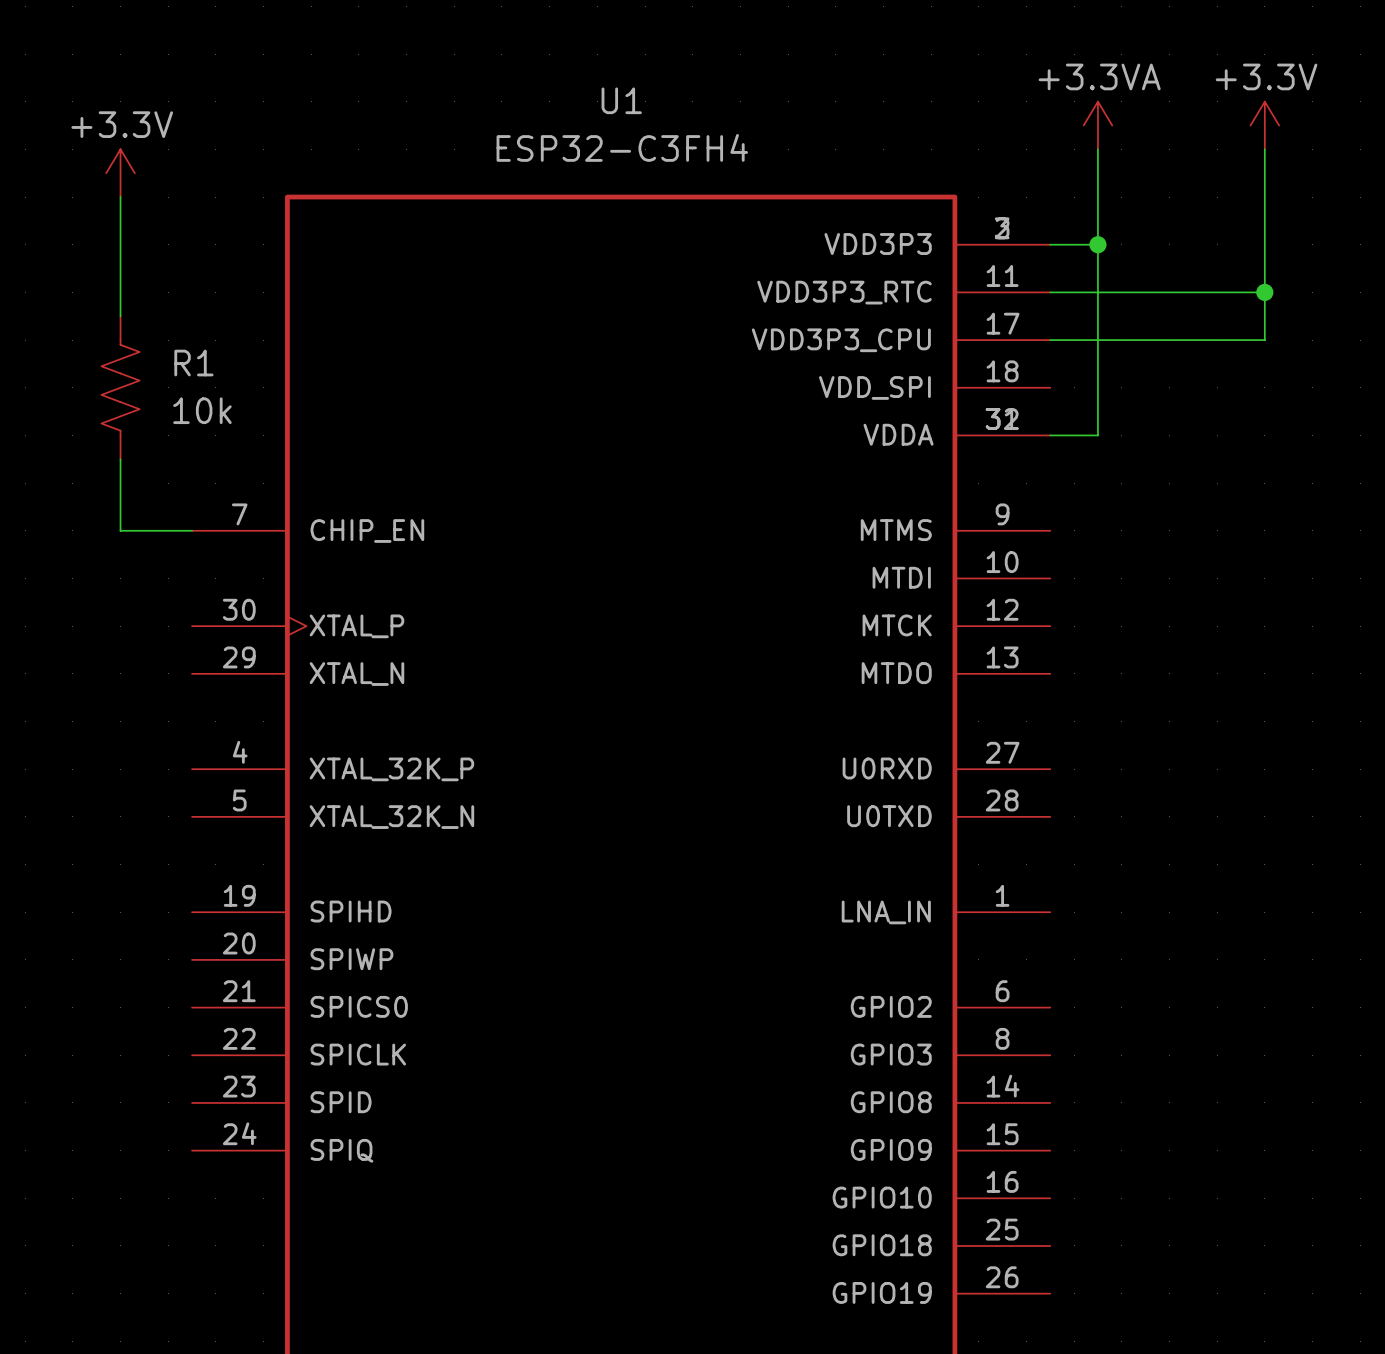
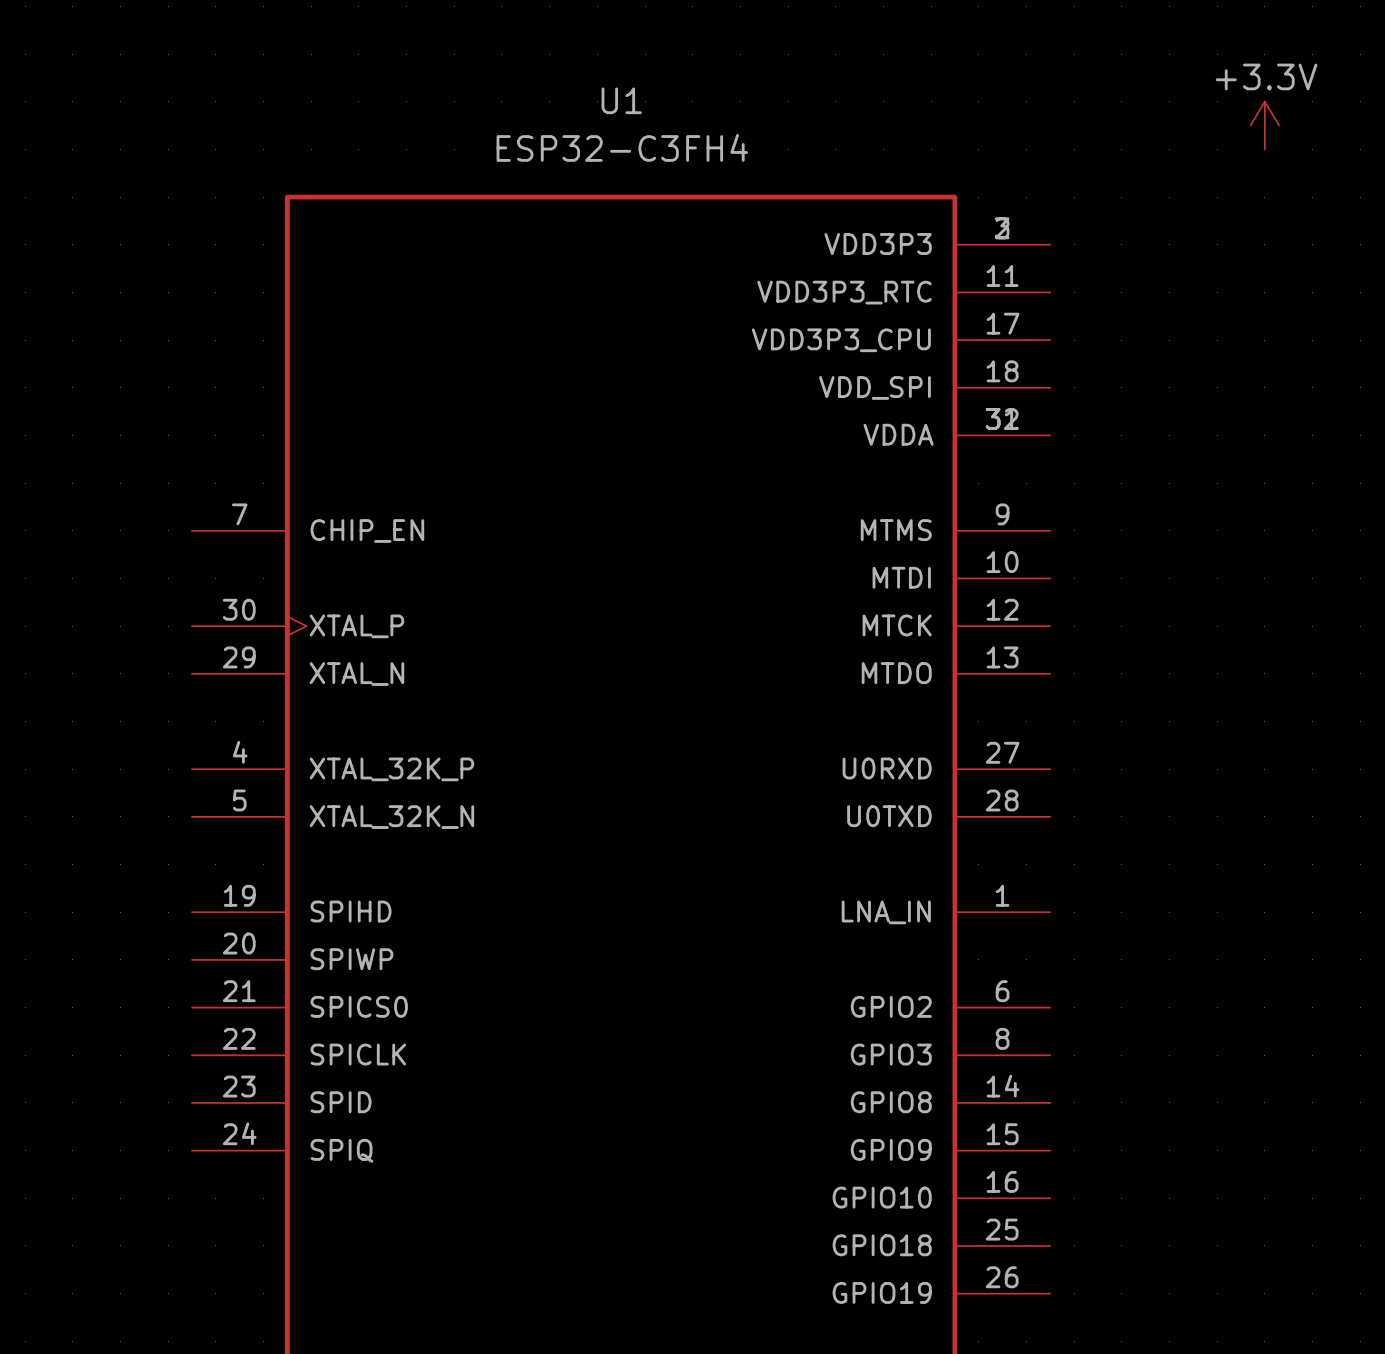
power symbol: +3.3VA (1097, 125) -> none
wire: (1097, 149) (1097, 435) (1050, 435) -> none
wire: (1264, 149) (1264, 340) (1050, 340) -> none
power symbol: +3.3V (120, 173) -> none
wire: (120, 197) (120, 316) -> none
wire: (1050, 244) (1097, 244) -> none
junction: (1097, 244) -> none
wire: (1050, 292) (1264, 292) -> none
junction: (1264, 292) -> none
R1: 10k (120, 387) -> none
wire: (120, 459) (120, 530) (192, 530) -> none

